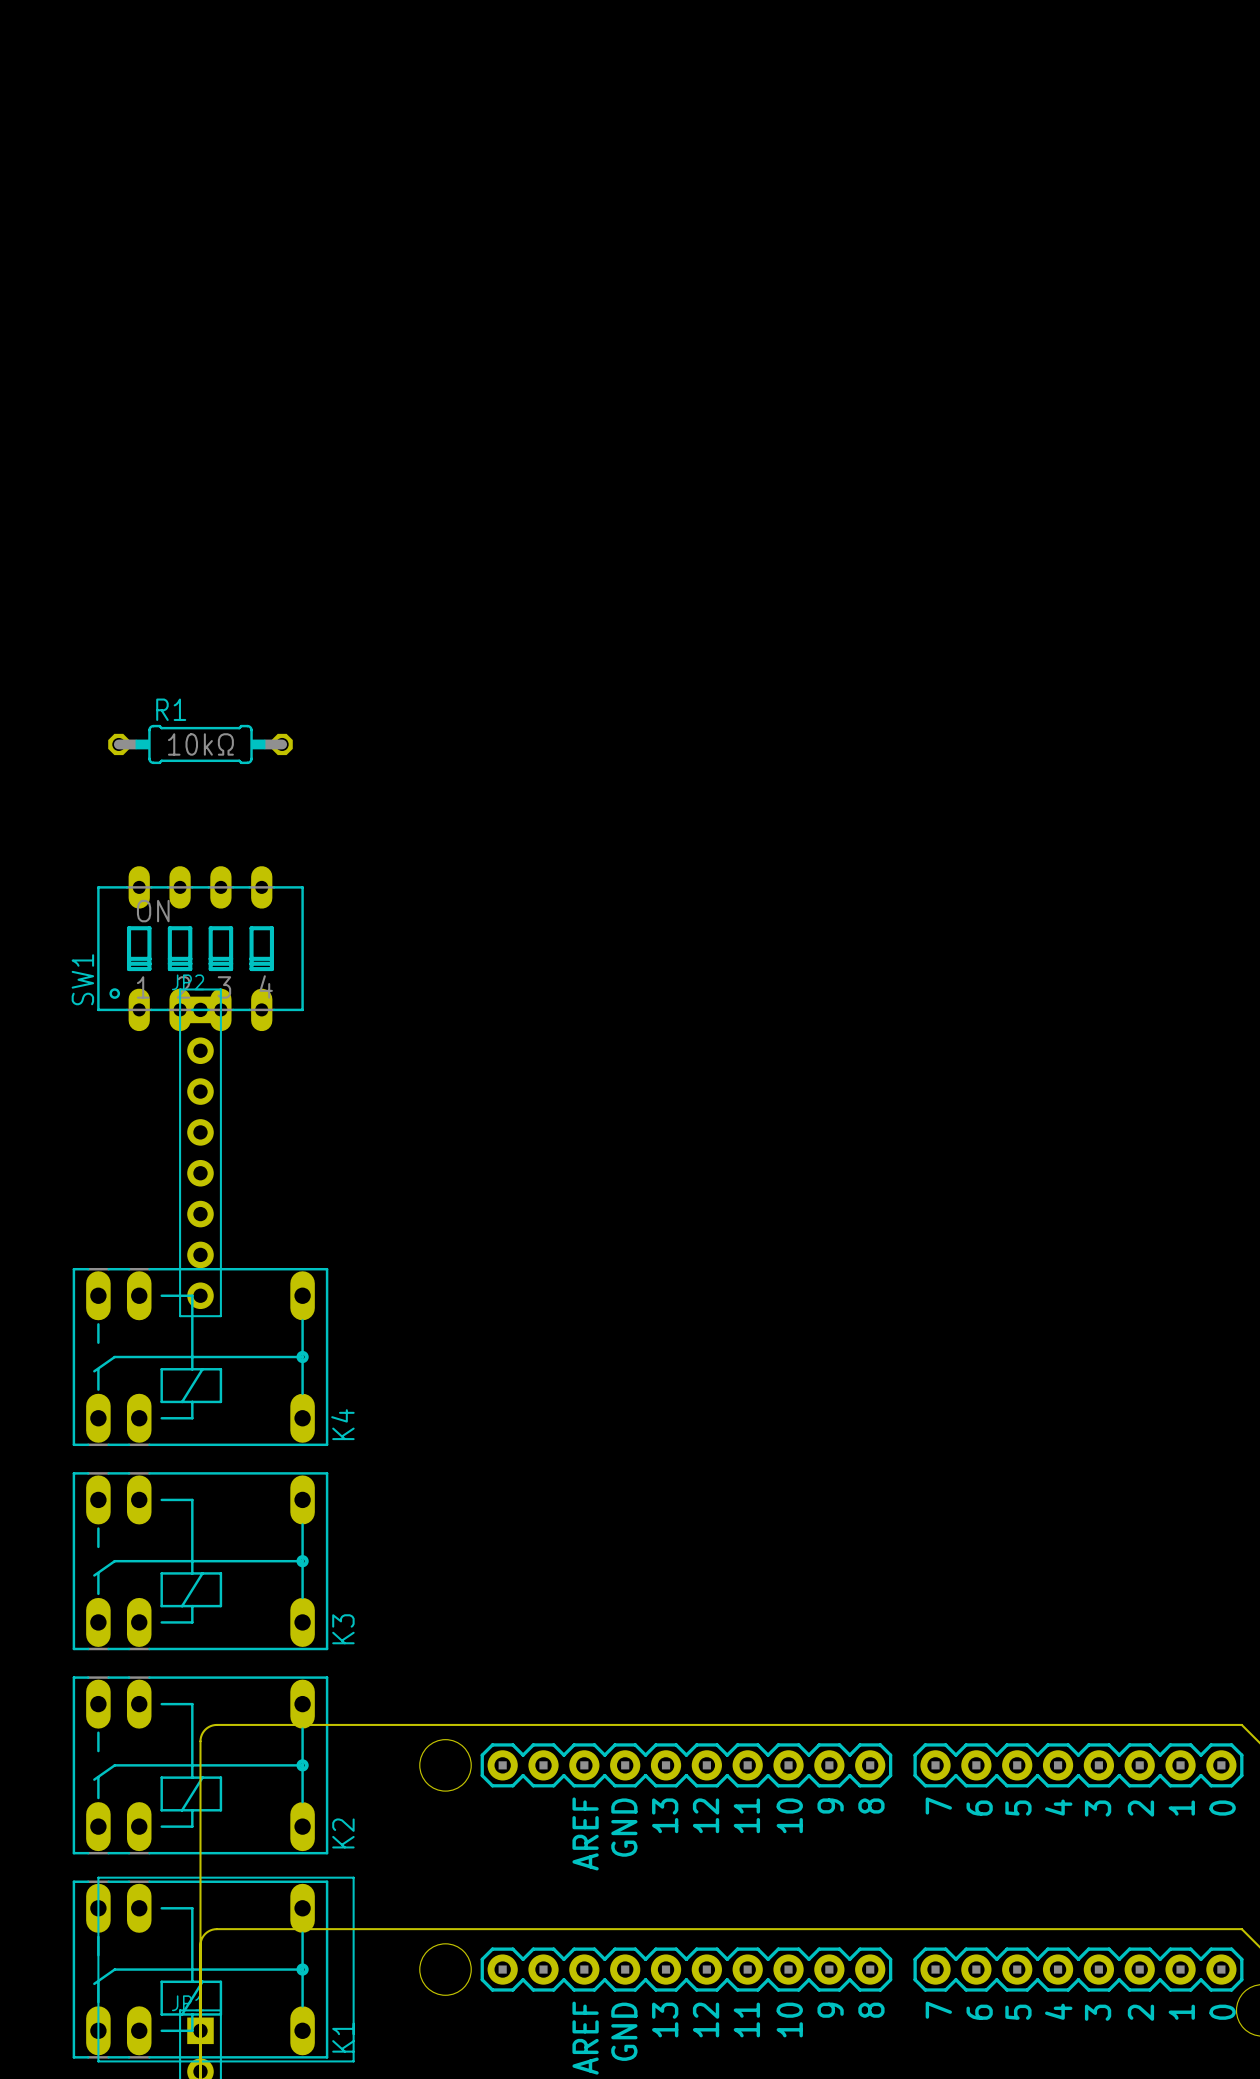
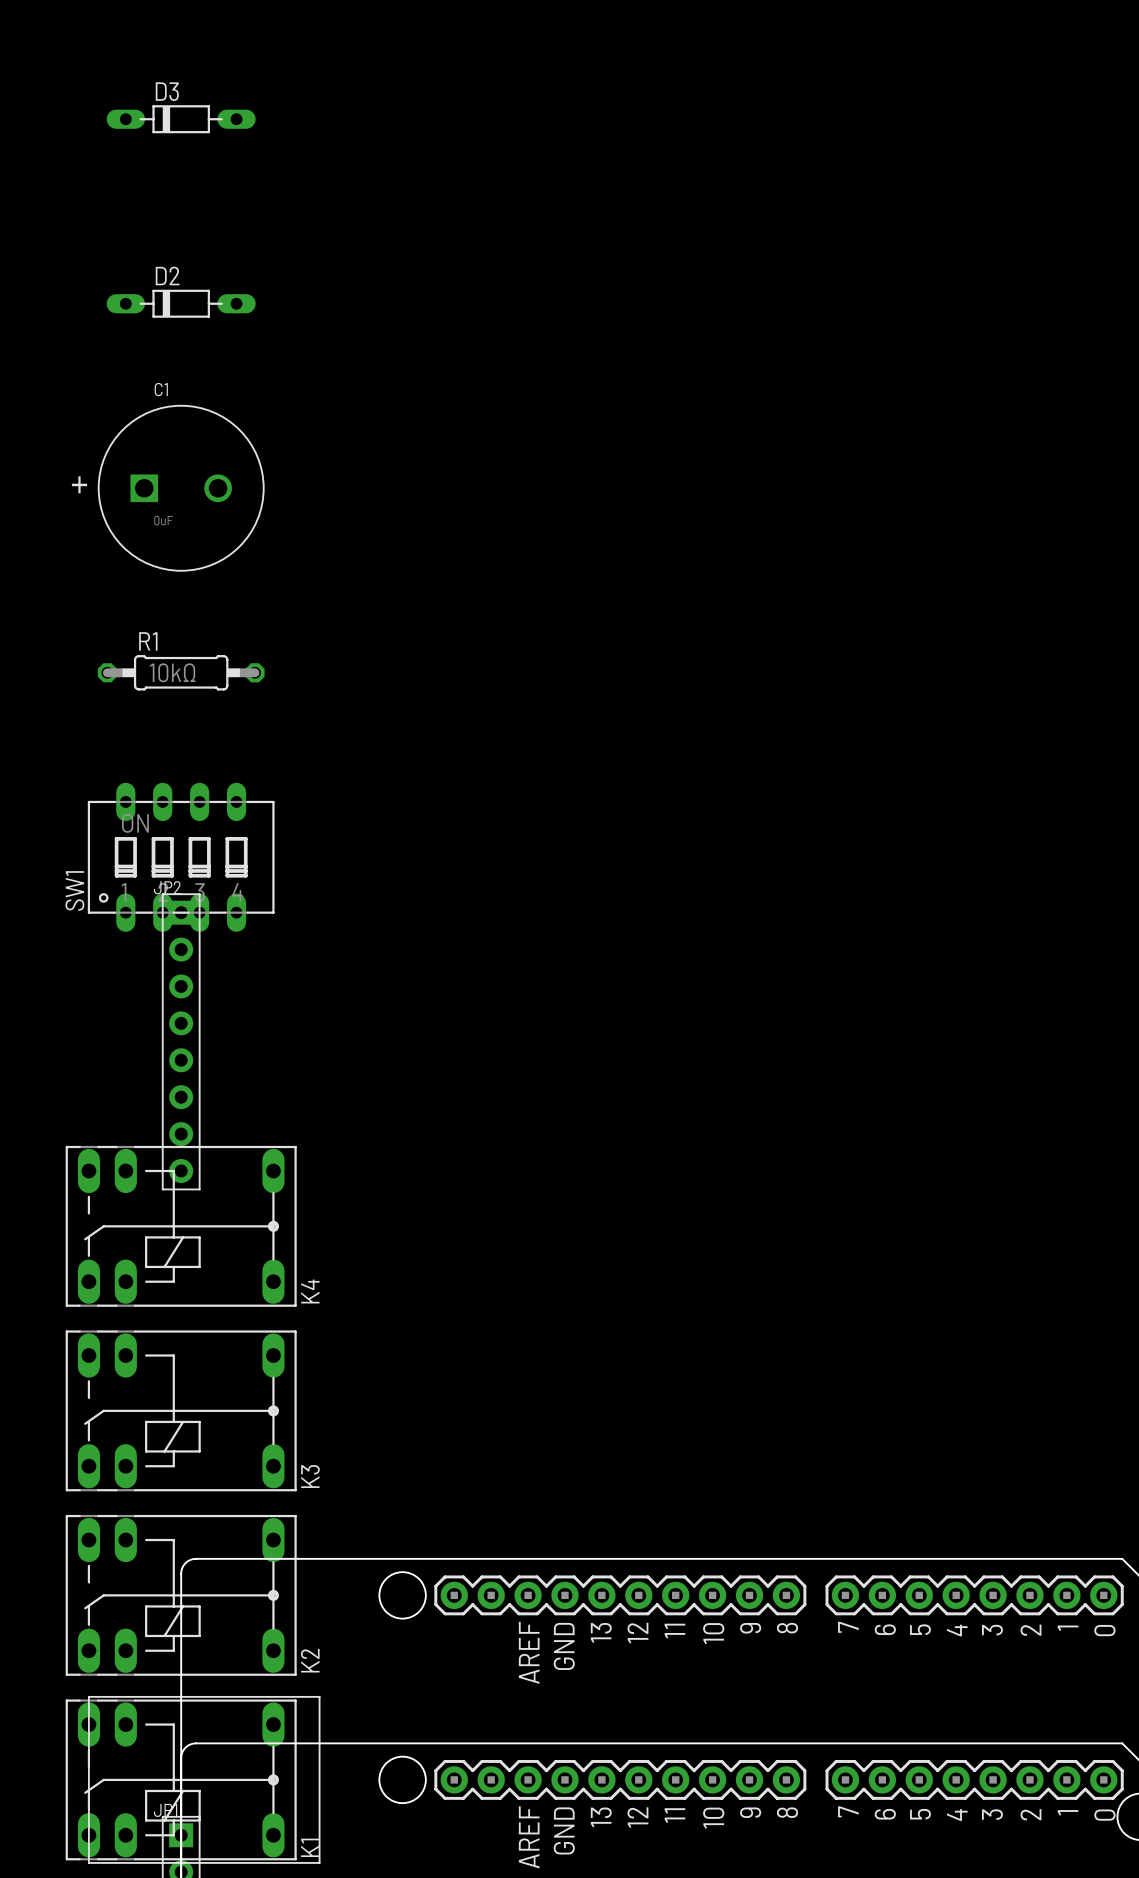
D3: none -> (181, 119)
D2: none -> (181, 303)
C1: none -> 0uF (181, 488)

